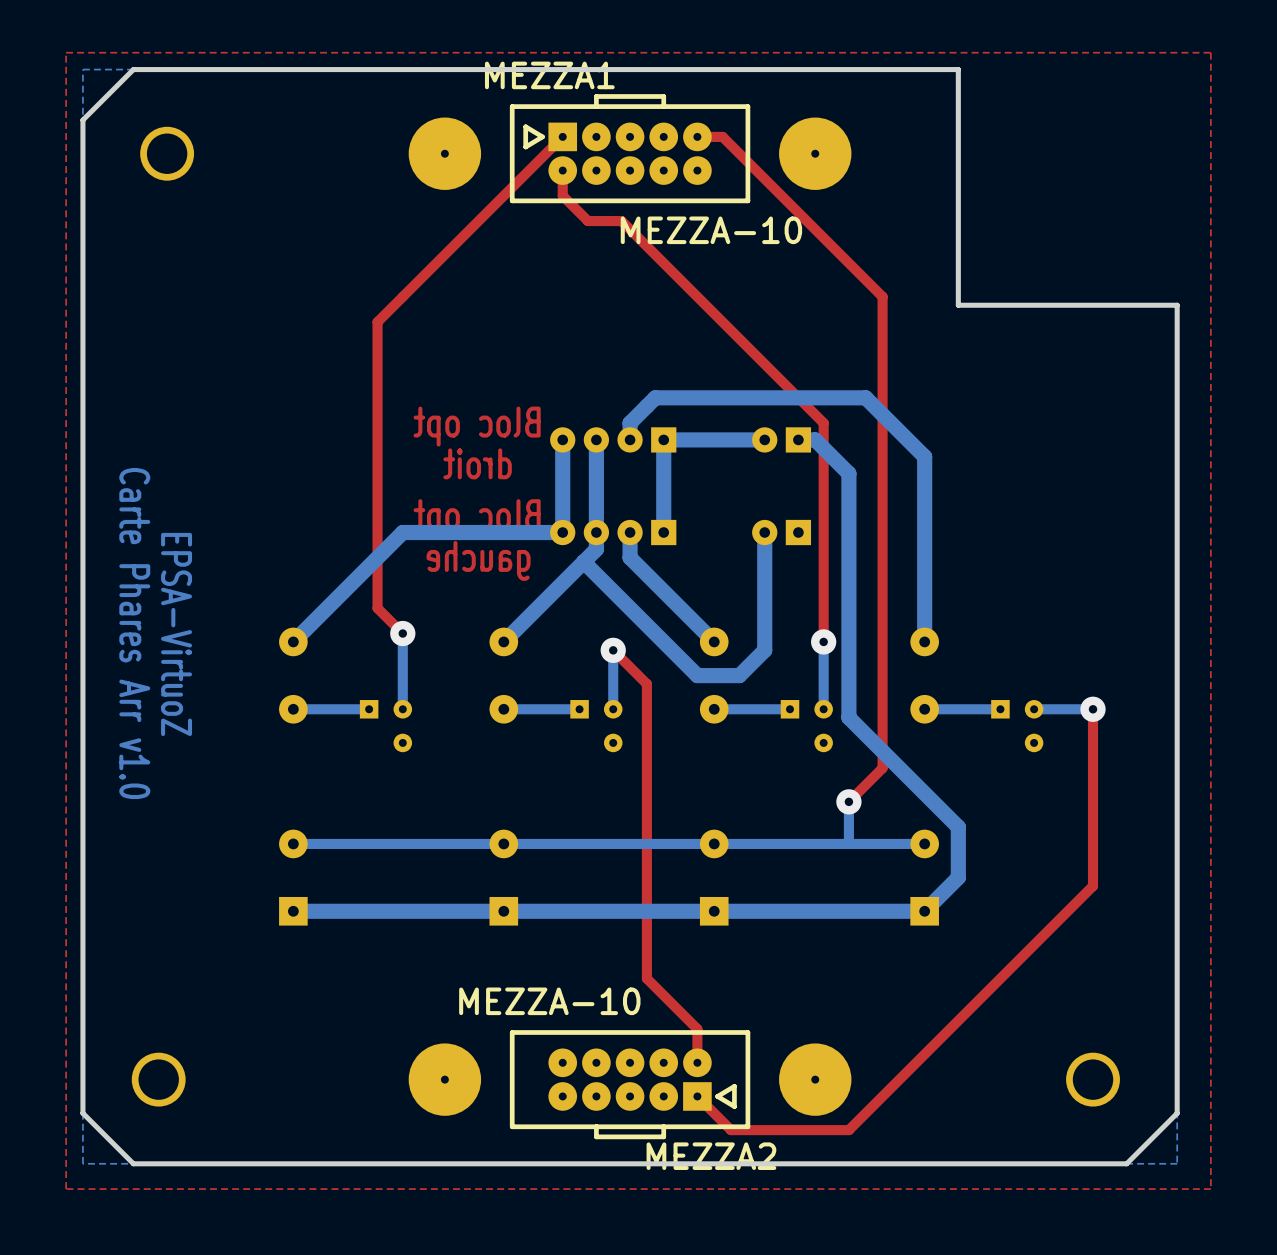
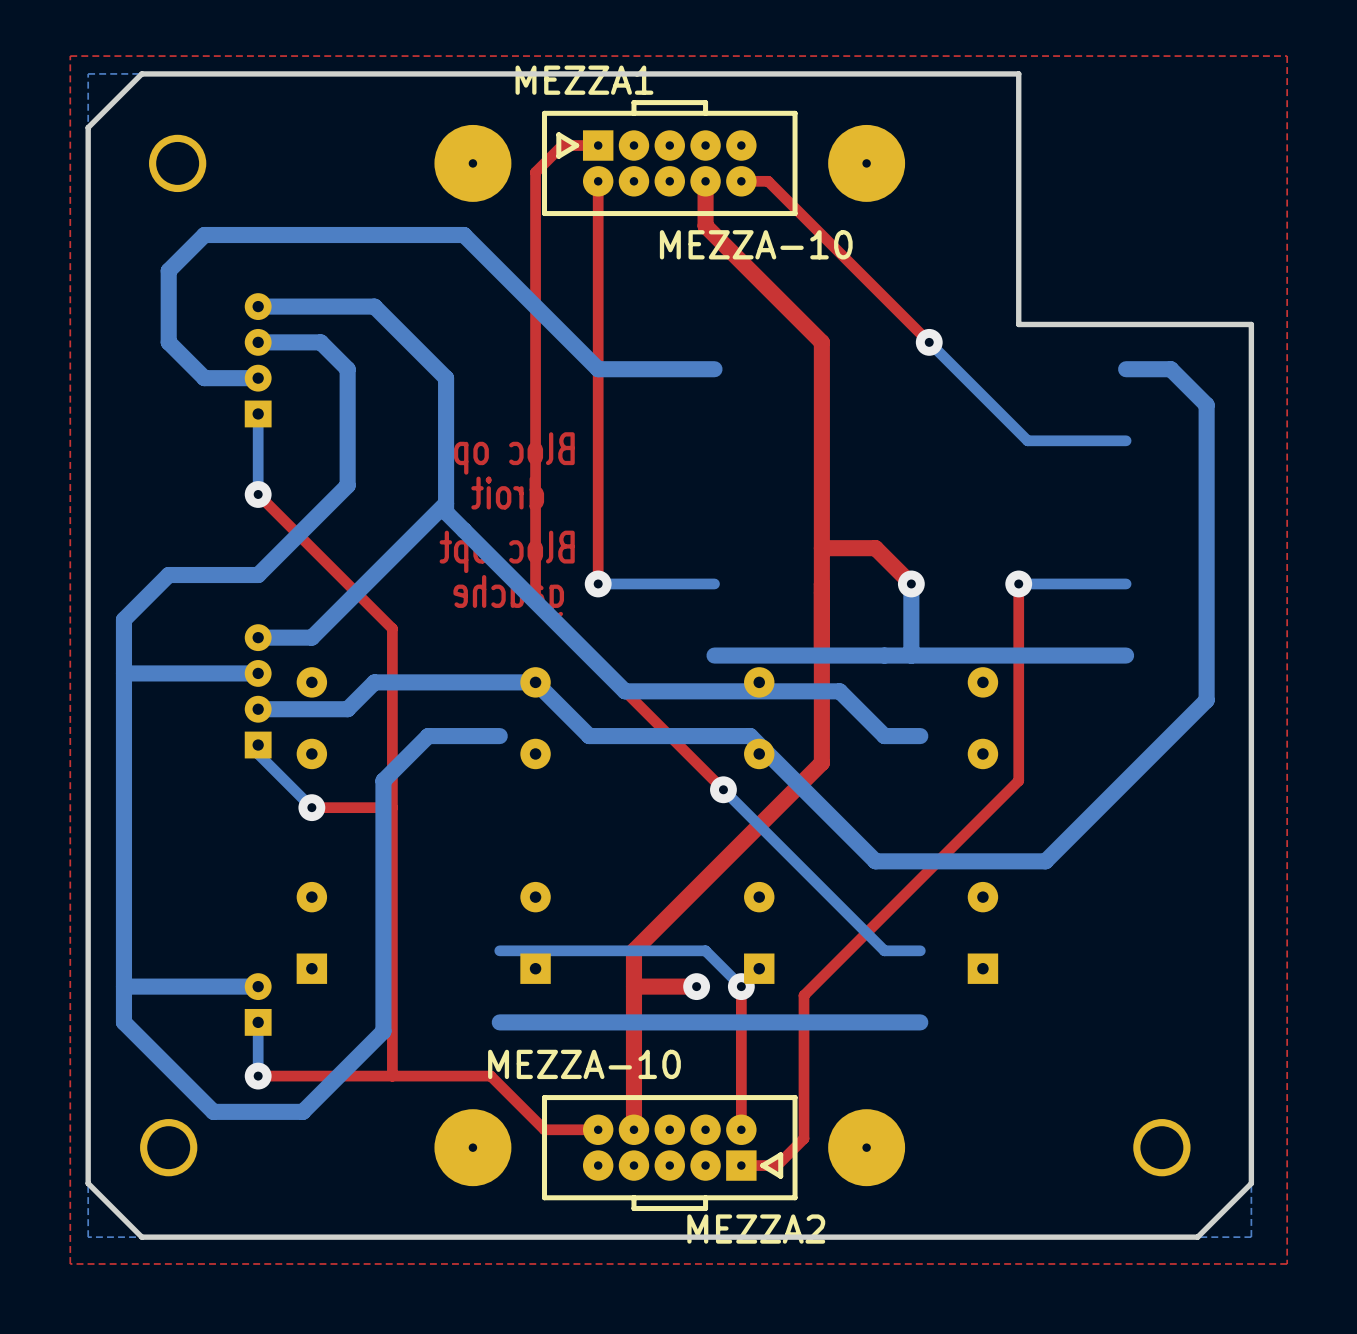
top track: (562, 136) (377, 322) (377, 608) (402, 633) -> (598, 145) (562, 145) (535, 172) (535, 601) (723, 789)
top track: (697, 136) (722, 136) (882, 296) (882, 768) (848, 801) -> none
top track: none -> (705, 181) (705, 226) (821, 342) (821, 762) (633, 950) (633, 1129)
top track: none -> (741, 181) (768, 181) (929, 342)
top track: (562, 195) (587, 221) (621, 221) (823, 423) (823, 641) -> (598, 208) (598, 583)
bottom track: none -> (258, 306) (374, 306) (446, 378) (446, 512) (625, 691) (839, 691) (884, 736) (920, 736)
bottom track: none -> (258, 342) (320, 342) (347, 369) (347, 485) (258, 575) (168, 575) (123, 619) (123, 1022) (213, 1111) (302, 1111) (383, 1031) (383, 780) (428, 736) (499, 736)
bottom track: none -> (929, 342) (1027, 440) (1126, 440)
via: none -> (929, 342)
part: none -> (258, 360)
bottom track: none -> (714, 369) (598, 369) (463, 235) (204, 235) (168, 270) (168, 342) (204, 378) (258, 378)
bottom track: none -> (1126, 369) (1170, 369) (1206, 405) (1206, 700) (1045, 861) (875, 861) (750, 736) (589, 736) (535, 682) (374, 682) (347, 709) (258, 709)
bottom track: (562, 439) (562, 532) (402, 532) (293, 641) -> none
bottom track: (596, 439) (596, 549) (503, 641) -> none
part: (613, 439) -> none
bottom track: (630, 439) (630, 423) (655, 397) (865, 397) (924, 456) (924, 641) -> none
bottom track: (764, 439) (663, 439) (663, 532) -> none
part: (781, 439) -> none
bottom track: (798, 439) (815, 439) (848, 473) (848, 717) (958, 827) (958, 877) (924, 911) (293, 911) -> none
top track: none -> (258, 494) (392, 628) (392, 1076)
via: none -> (258, 494)
bottom track: none -> (446, 503) (311, 637) (258, 637)
top track: none -> (821, 548) (875, 548) (911, 583)
part: (613, 532) -> none
bottom track: (630, 532) (630, 557) (714, 641) -> none
bottom track: (764, 532) (764, 650) (739, 675) (697, 675) (583, 561) -> none
part: (781, 532) -> none
via: none -> (598, 583)
bottom track: none -> (714, 583) (598, 583)
via: none -> (911, 583)
via: none -> (1018, 583)
bottom track: none -> (1126, 583) (1018, 583)
bottom track: none -> (1126, 655) (714, 655)
text: Carte Phares Arr v1.0 (134, 633) -> none
bottom track: none -> (258, 673) (123, 673)
bottom track: (402, 633) (402, 709) -> (258, 413) (258, 494)
via: (402, 633) -> none
text: EPSA-VirtuoZ (176, 634) -> none
bottom track: (823, 641) (823, 709) -> (911, 583) (911, 655)
via: (823, 641) -> none
part: none -> (258, 691)
bottom track: (613, 650) (613, 709) -> none
top track: (613, 650) (646, 684) (646, 978) (697, 1029) (697, 1062) -> (741, 986) (741, 1129)
via: (613, 650) -> none
bottom track: none -> (258, 745) (258, 753) (311, 807)
bottom track: (369, 709) (293, 709) -> none
bottom track: (579, 709) (503, 709) -> none
bottom track: (789, 709) (714, 709) -> none
bottom track: (1000, 709) (924, 709) -> none
bottom track: (1093, 709) (1034, 709) -> none
top track: (1093, 709) (1093, 886) (848, 1130) (731, 1130) (697, 1096) -> (1018, 583) (1018, 780) (803, 995) (803, 1138) (777, 1165) (741, 1165)
via: (1093, 709) -> none
part: (385, 726) -> none
part: (596, 726) -> none
part: (806, 726) -> none
part: (1017, 726) -> none
bottom track: none -> (723, 789) (884, 950) (920, 950)
via: none -> (723, 789)
via: none -> (311, 807)
top track: none -> (392, 807) (311, 807)
bottom track: (848, 801) (848, 843) -> none
via: (848, 801) -> none
bottom track: (924, 843) (293, 843) -> none
bottom track: none -> (499, 950) (705, 950) (741, 986)
bottom track: none -> (258, 986) (123, 986)
top track: none -> (696, 986) (633, 986)
via: none -> (696, 986)
via: none -> (741, 986)
part: none -> (258, 1004)
bottom track: none -> (258, 1022) (258, 1076)
bottom track: none -> (920, 1022) (499, 1022)
top track: none -> (258, 1076) (490, 1076) (544, 1129) (598, 1129)
via: none -> (258, 1076)

